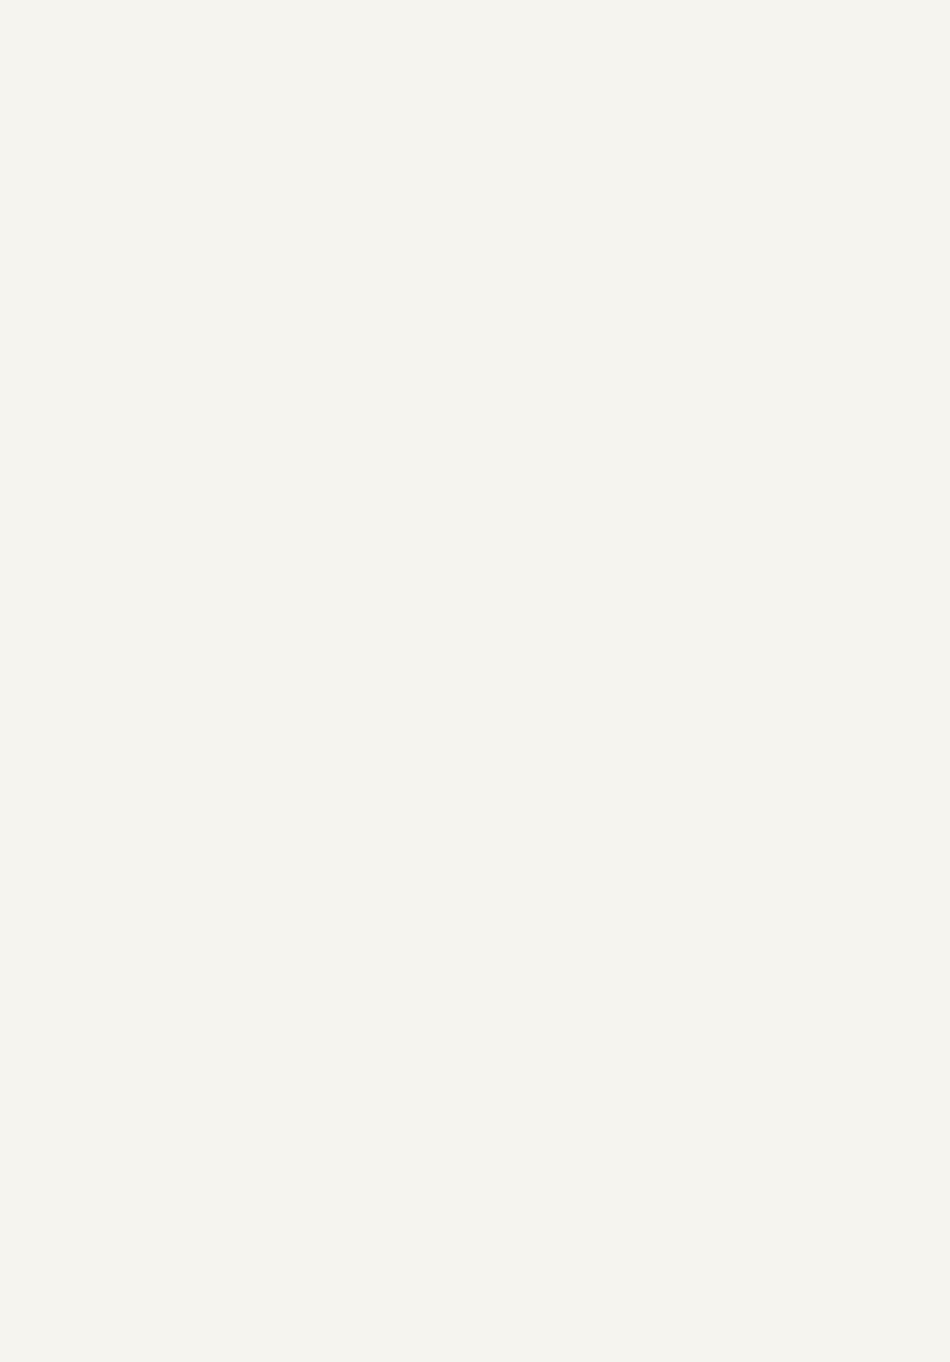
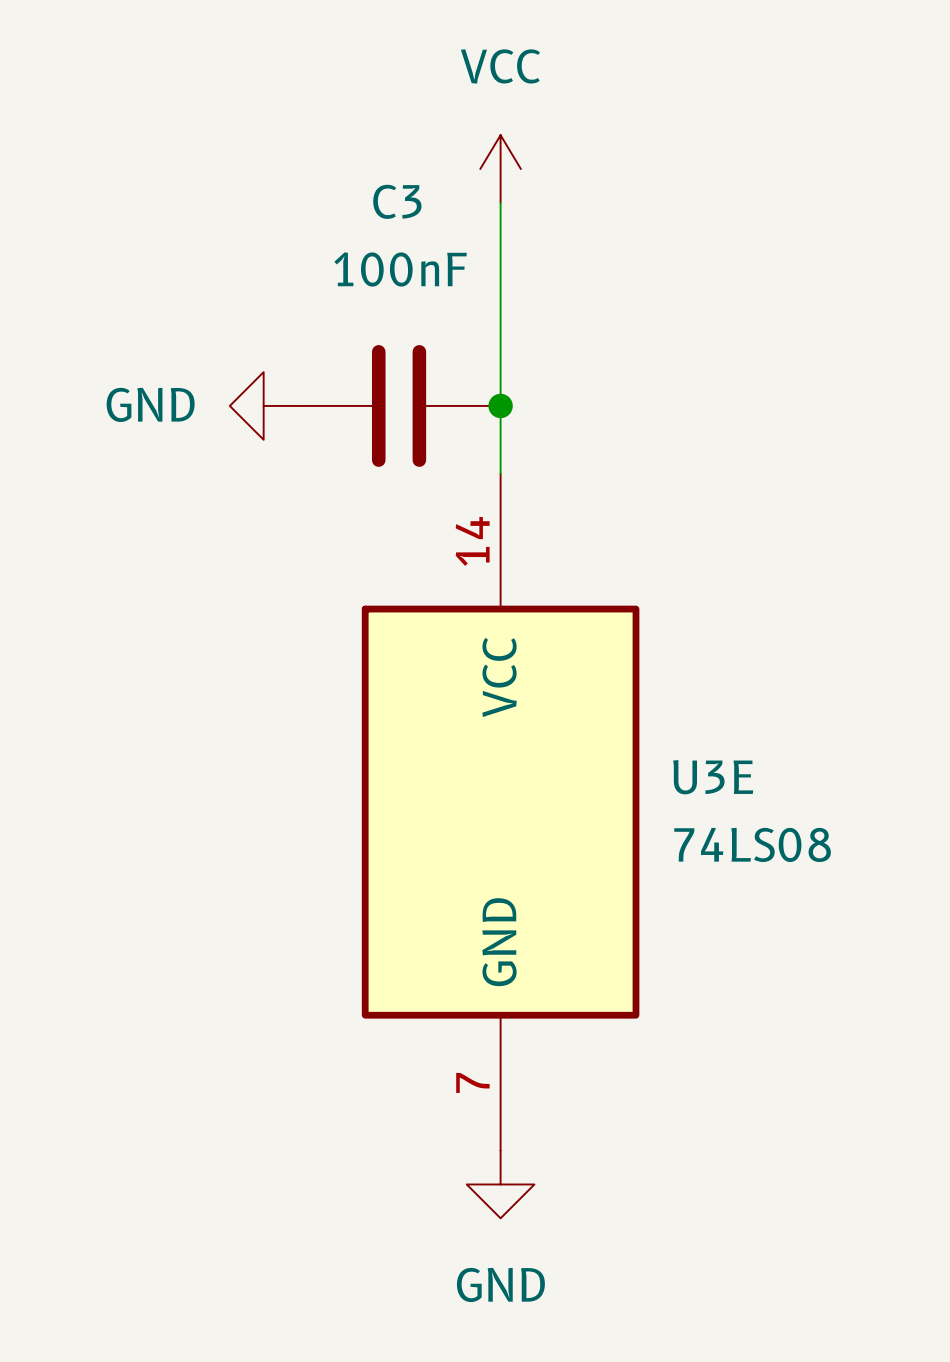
power symbol: none -> VCC (500, 169)
wire: none -> (500, 202) (500, 473)
power symbol: none -> GND (263, 405)
C3: none -> 100nF (399, 405)
junction: none -> (500, 405)
U3E: none -> 74LS08 (500, 812)
power symbol: none -> GND (500, 1184)

